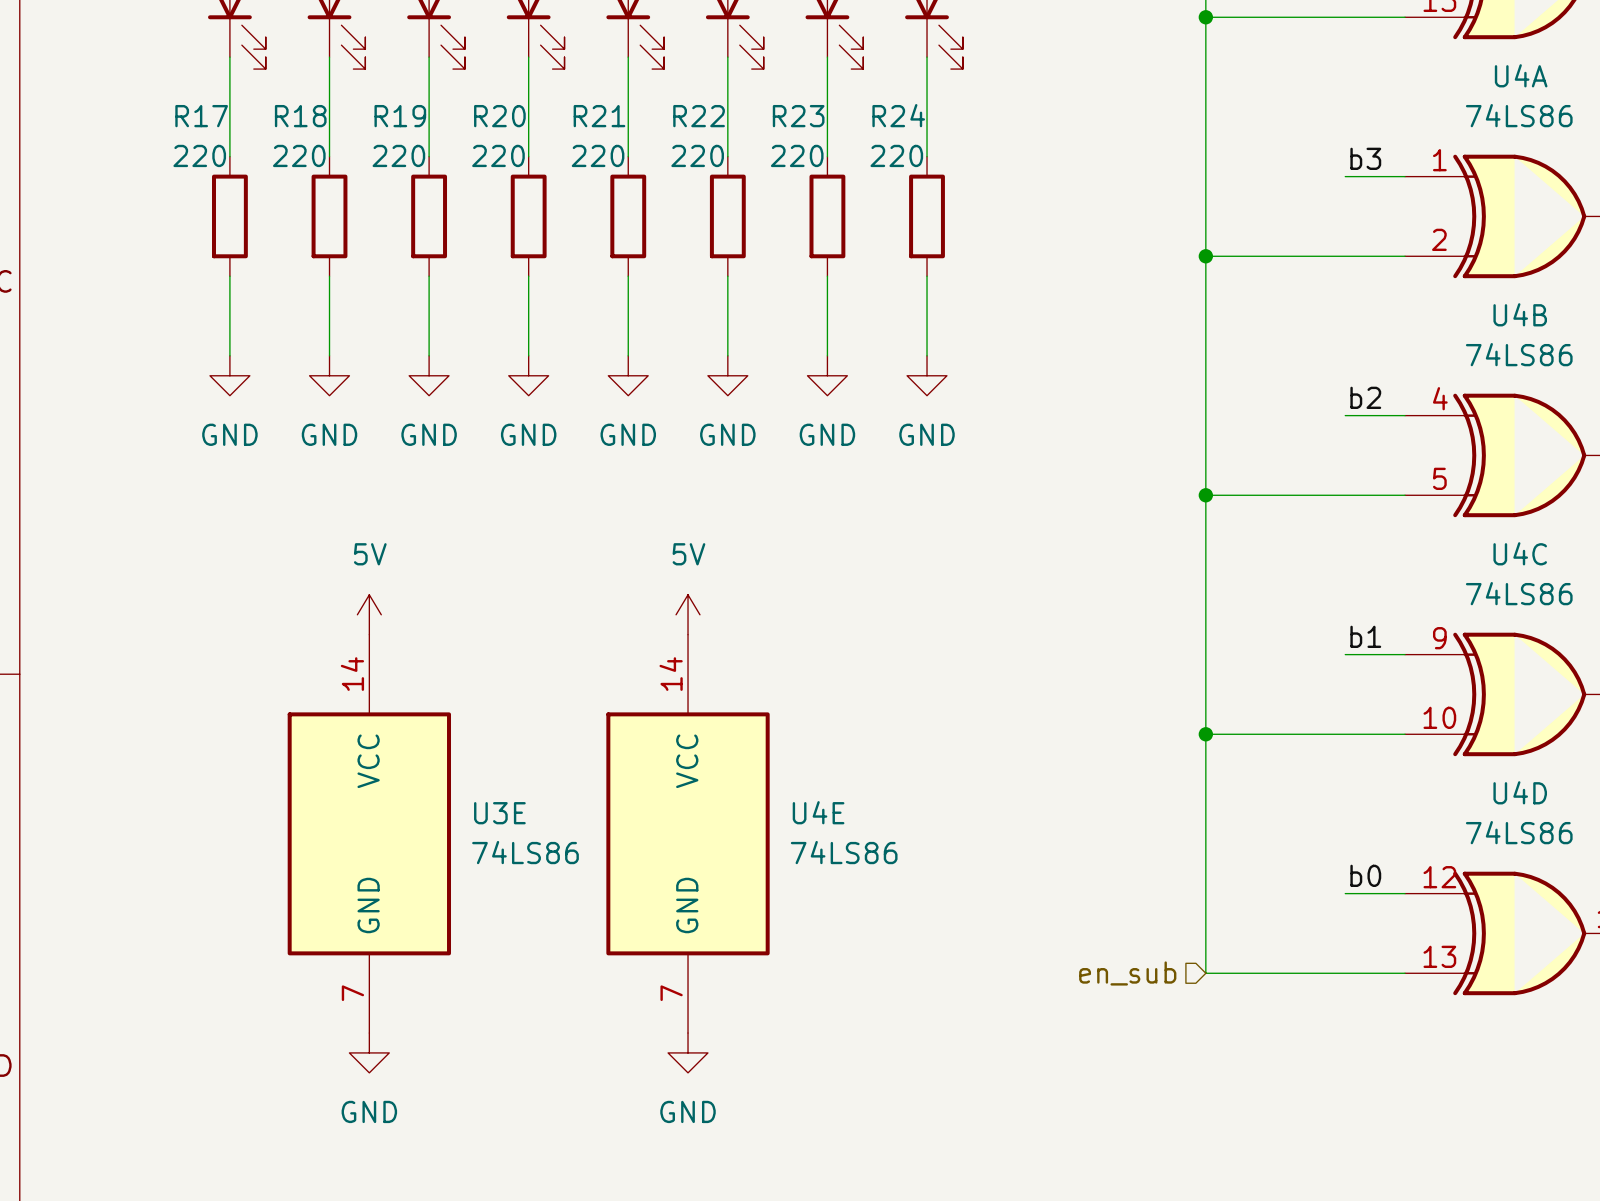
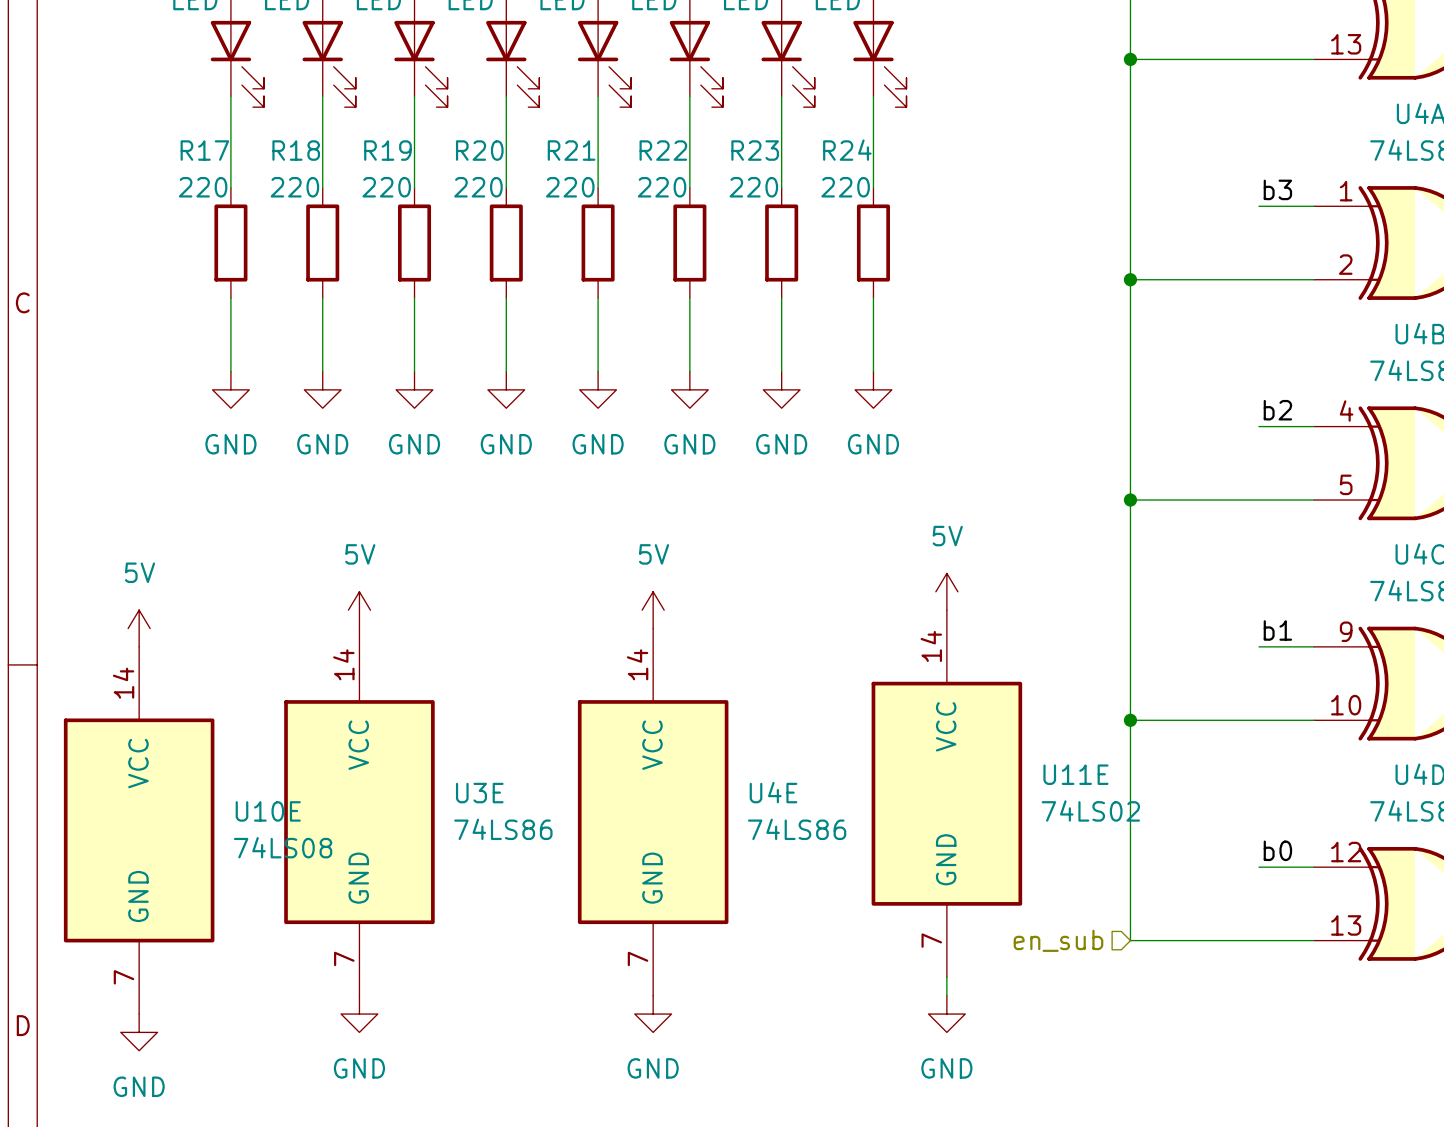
power symbol: none -> 5V (946, 591)
power symbol: none -> 5V (139, 628)
U11E: none -> 74LS02 (946, 793)
U10E: none -> 74LS08 (139, 830)
wire: none -> (946, 977) (946, 995)
power symbol: none -> GND (946, 1014)
power symbol: none -> GND (139, 1032)

